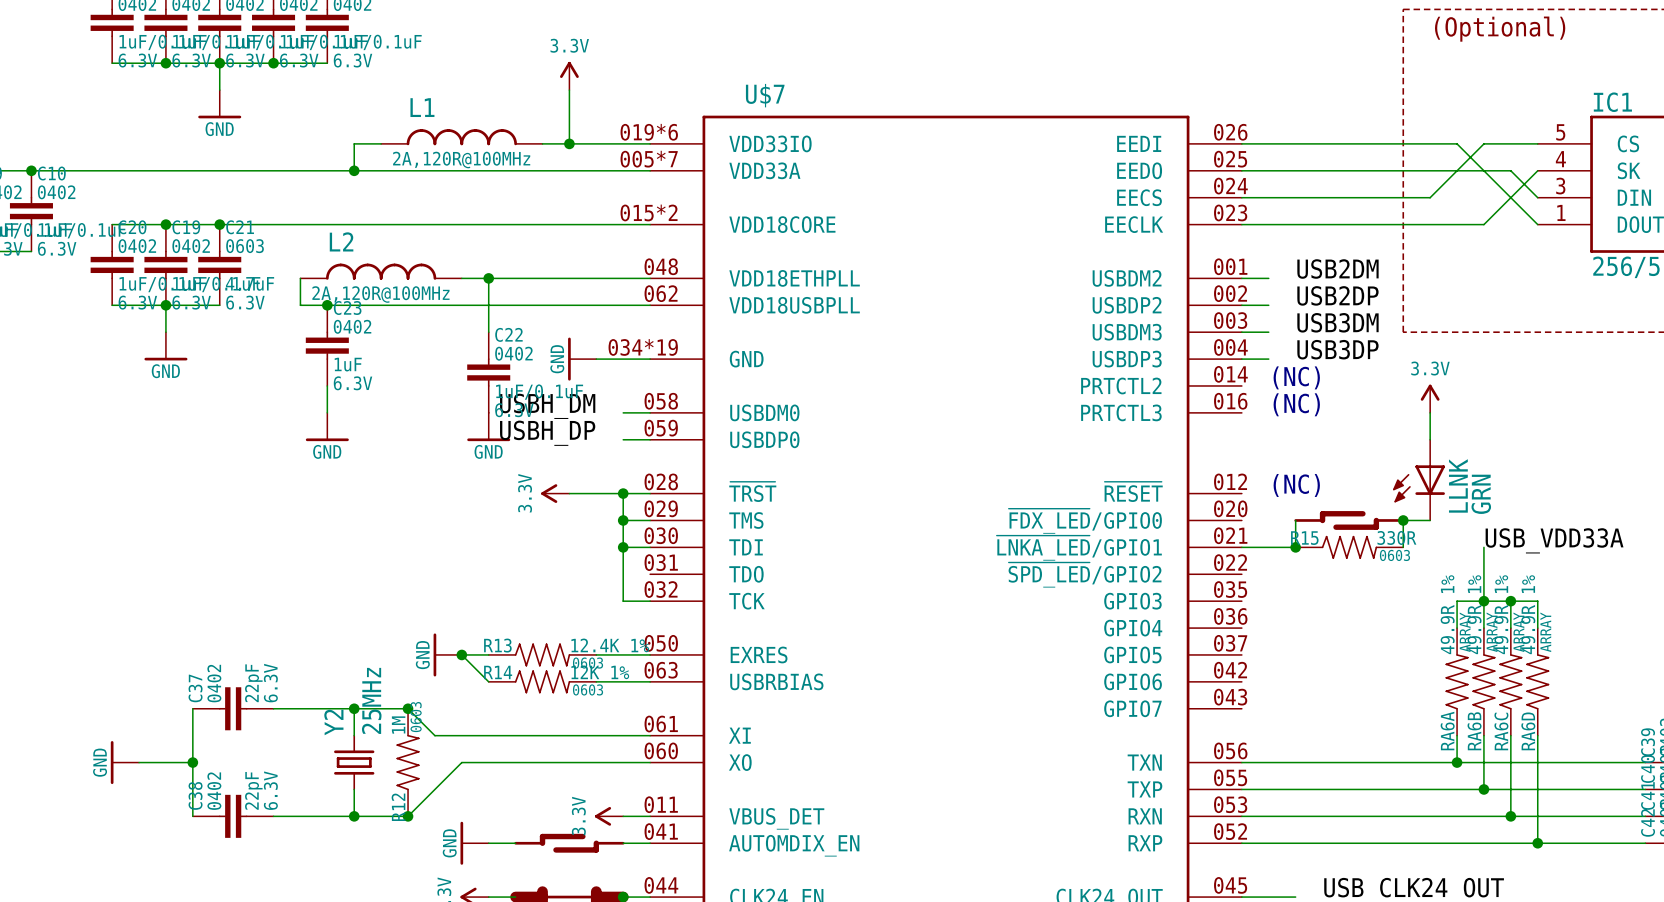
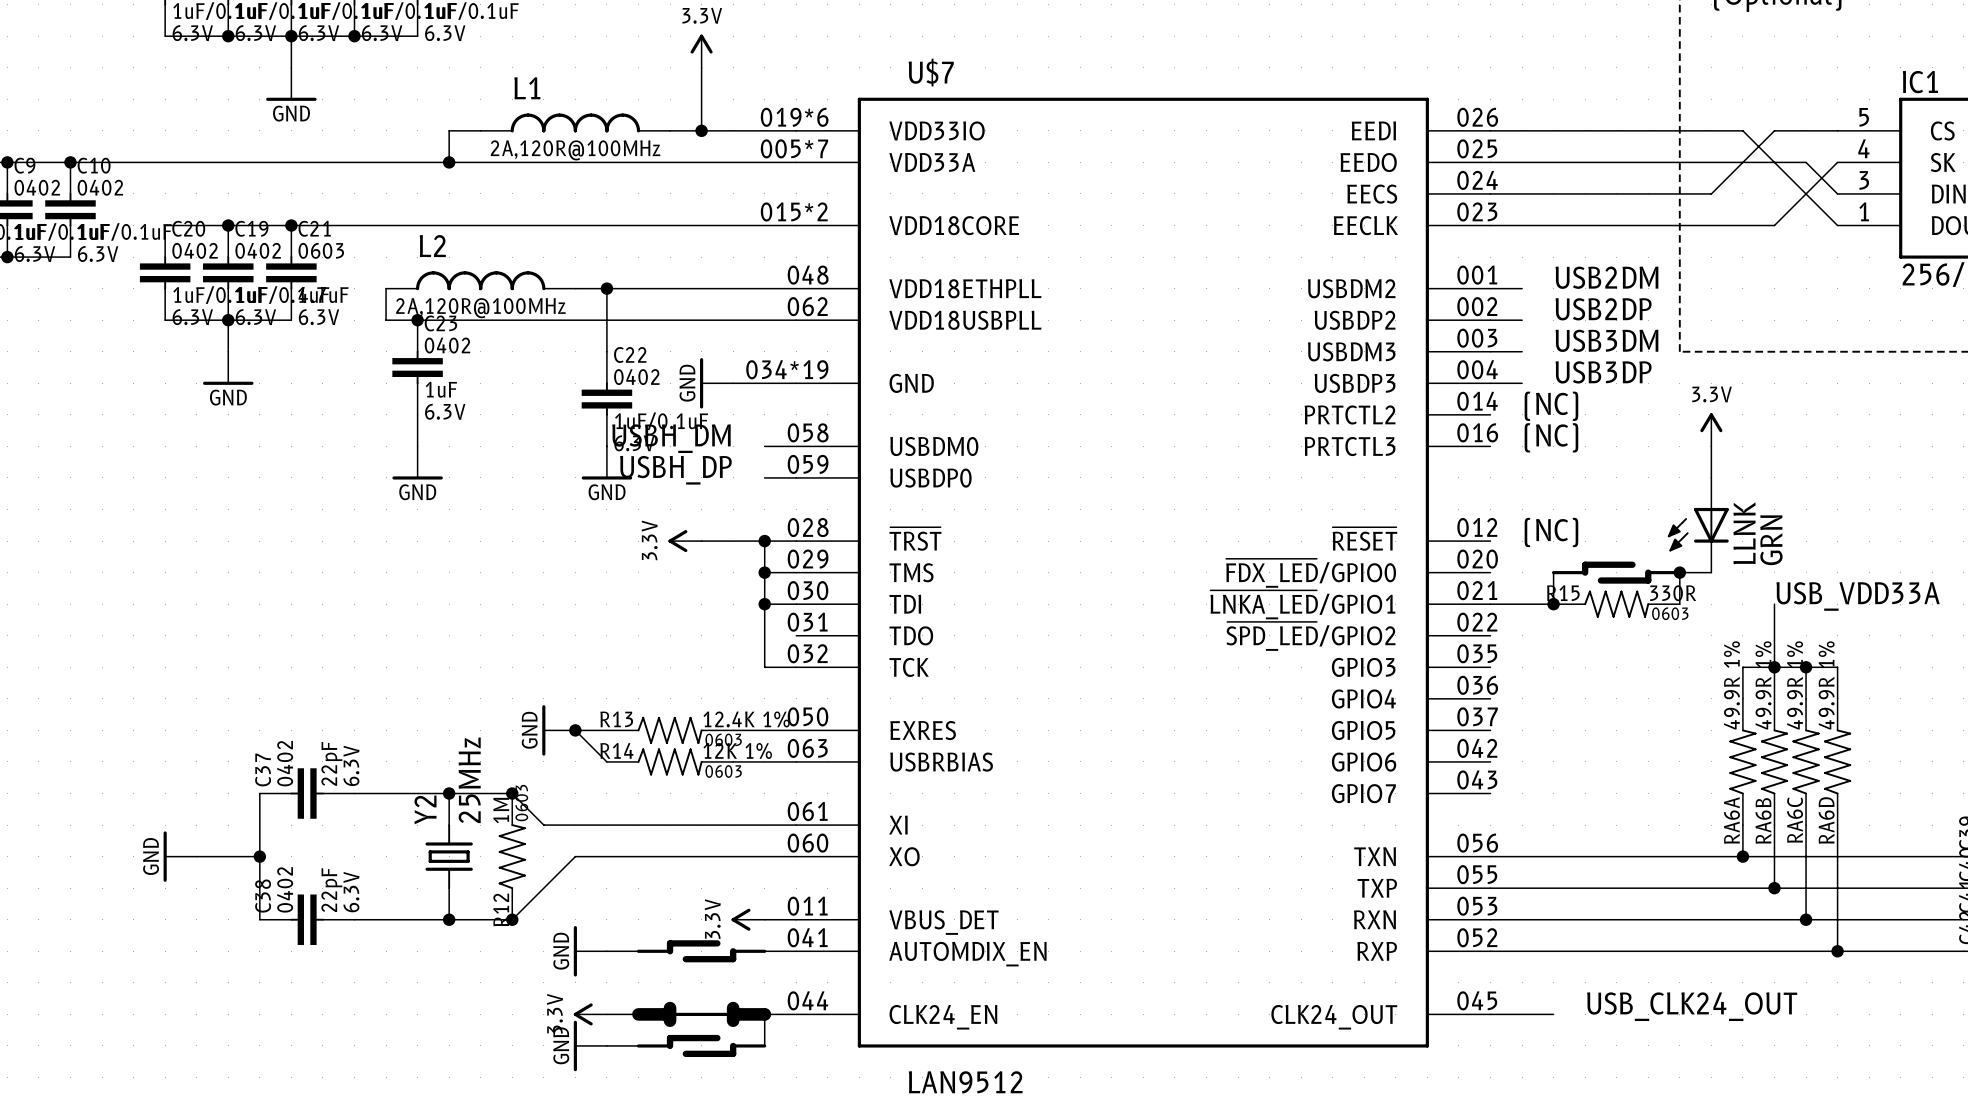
RA6A text: ARRAY (1465, 632) -> none
RA6B text: ARRAY (1492, 632) -> none
RA6C text: ARRAY (1518, 632) -> none
RA6D text: ARRAY (1545, 632) -> none

